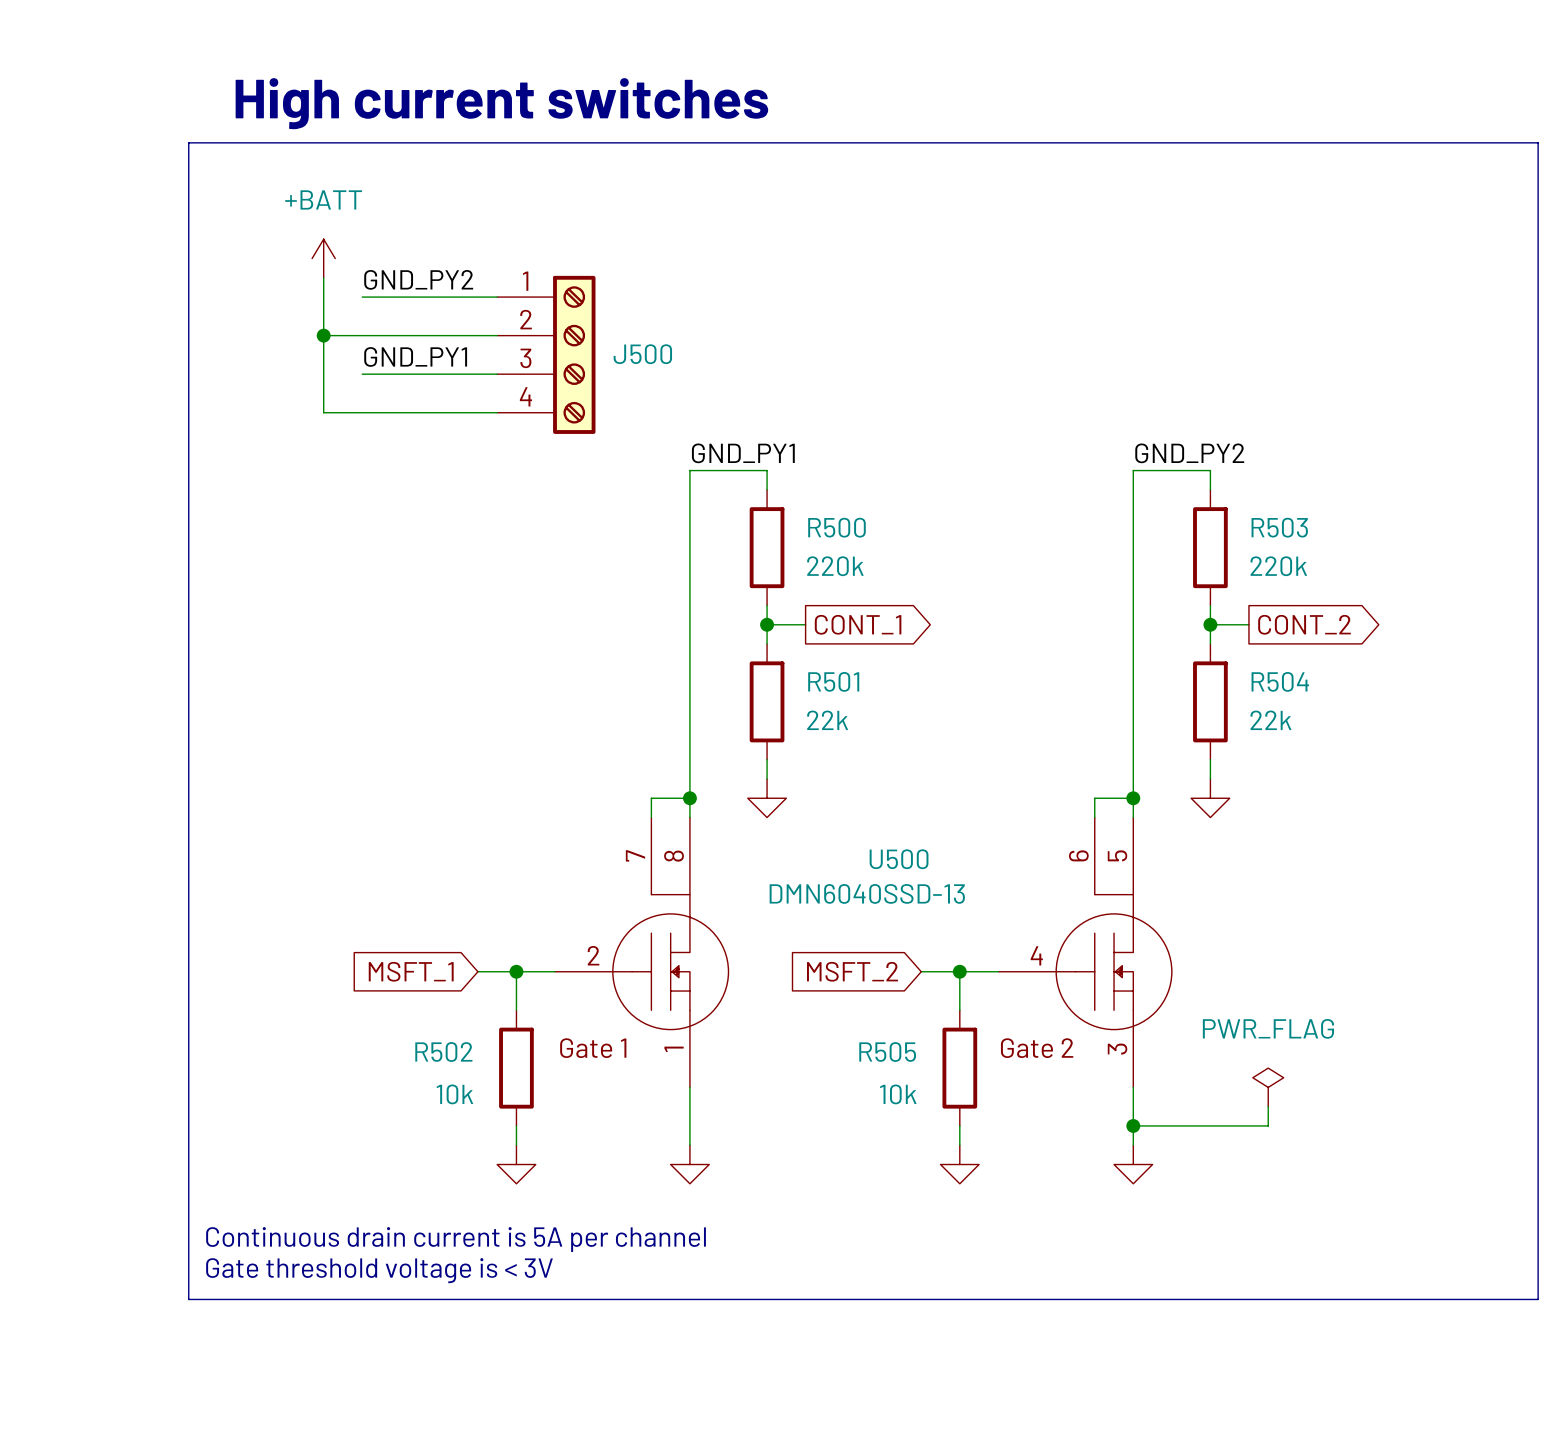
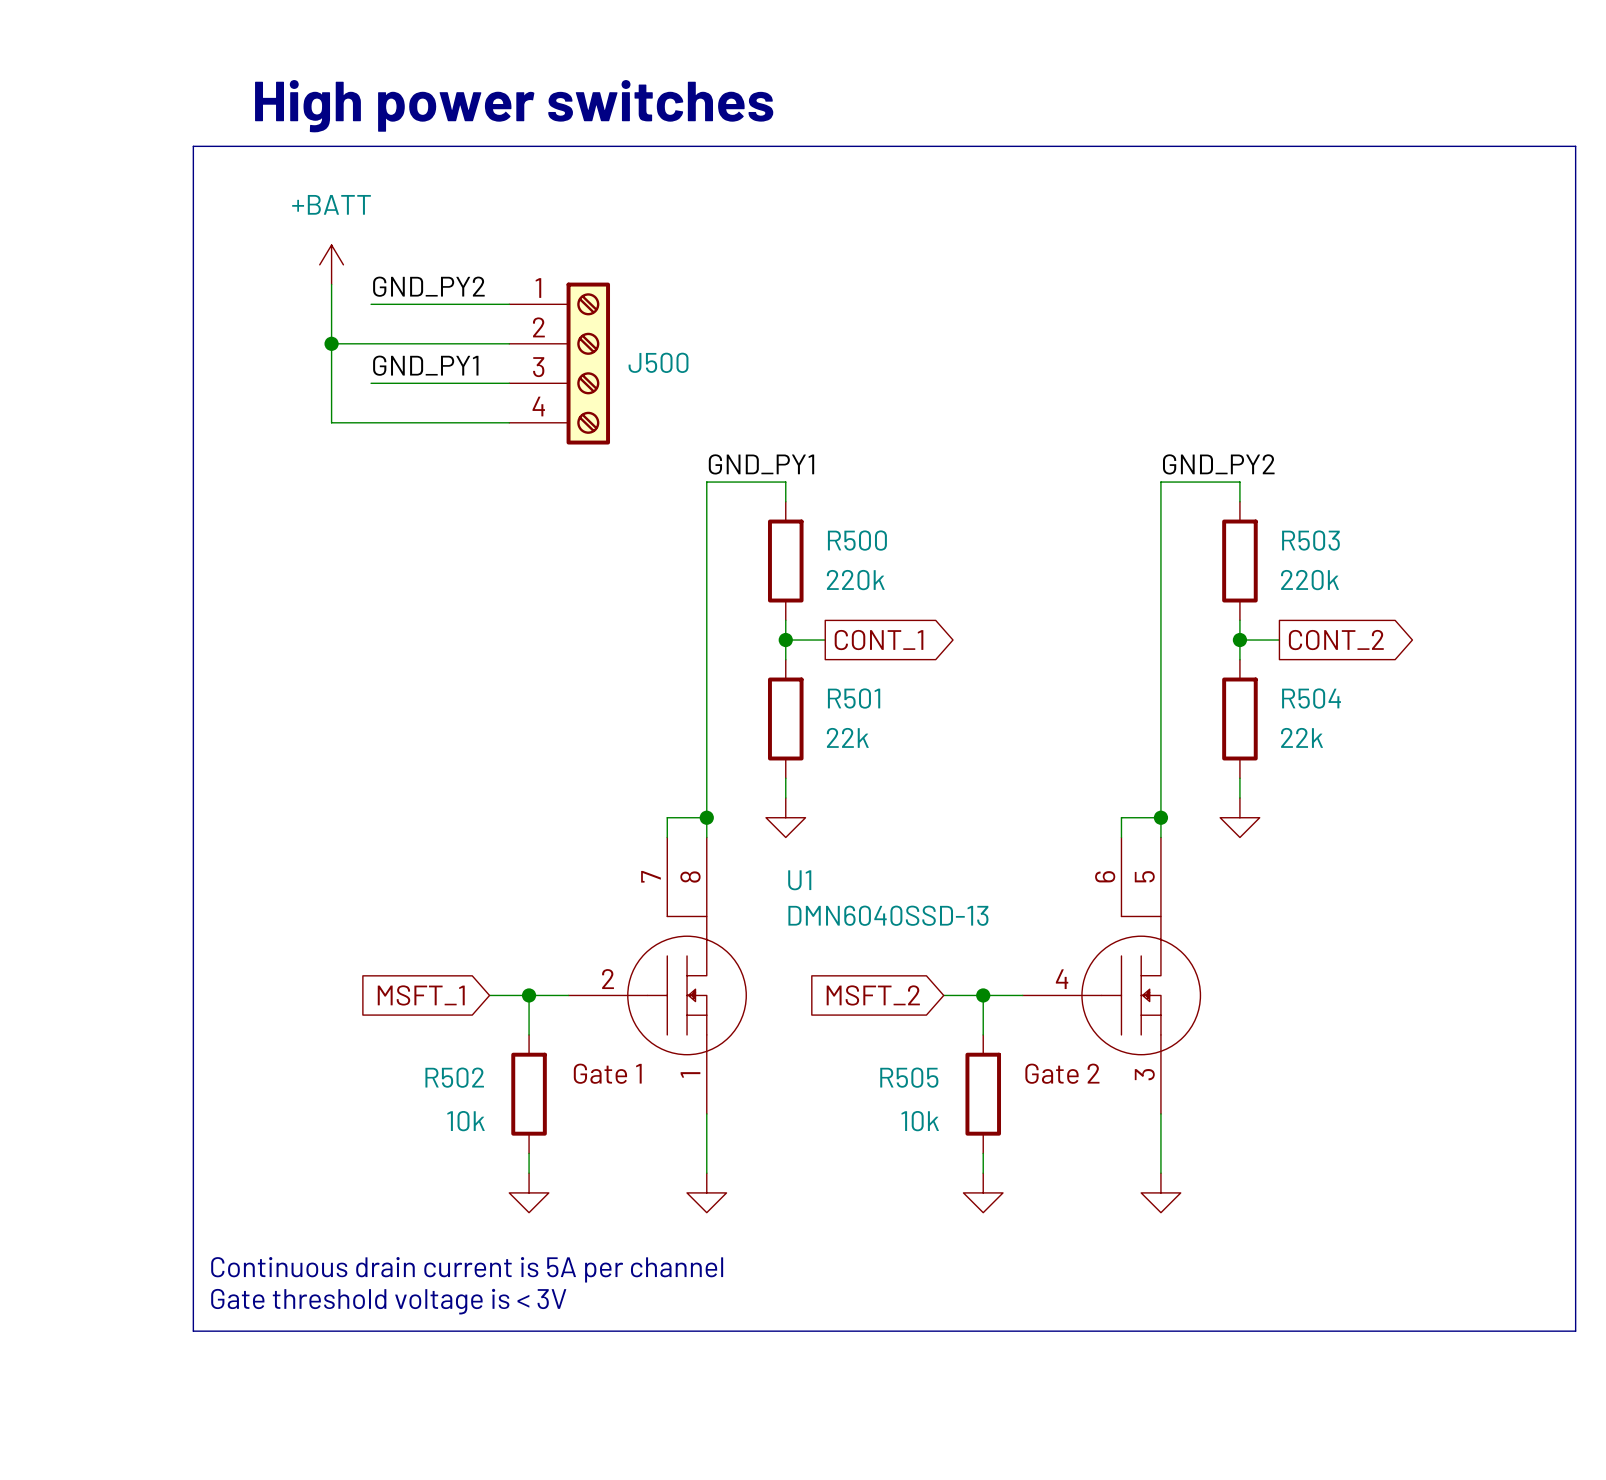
text: High current switches (501, 103) -> High power switches (514, 106)
U500 name: U500 (899, 859) -> U1 (799, 880)
power symbol: PWR_FLAG (1268, 1087) -> none
wire: (1268, 1106) (1268, 1125) (1133, 1125) -> none
junction: (1133, 1125) -> none

